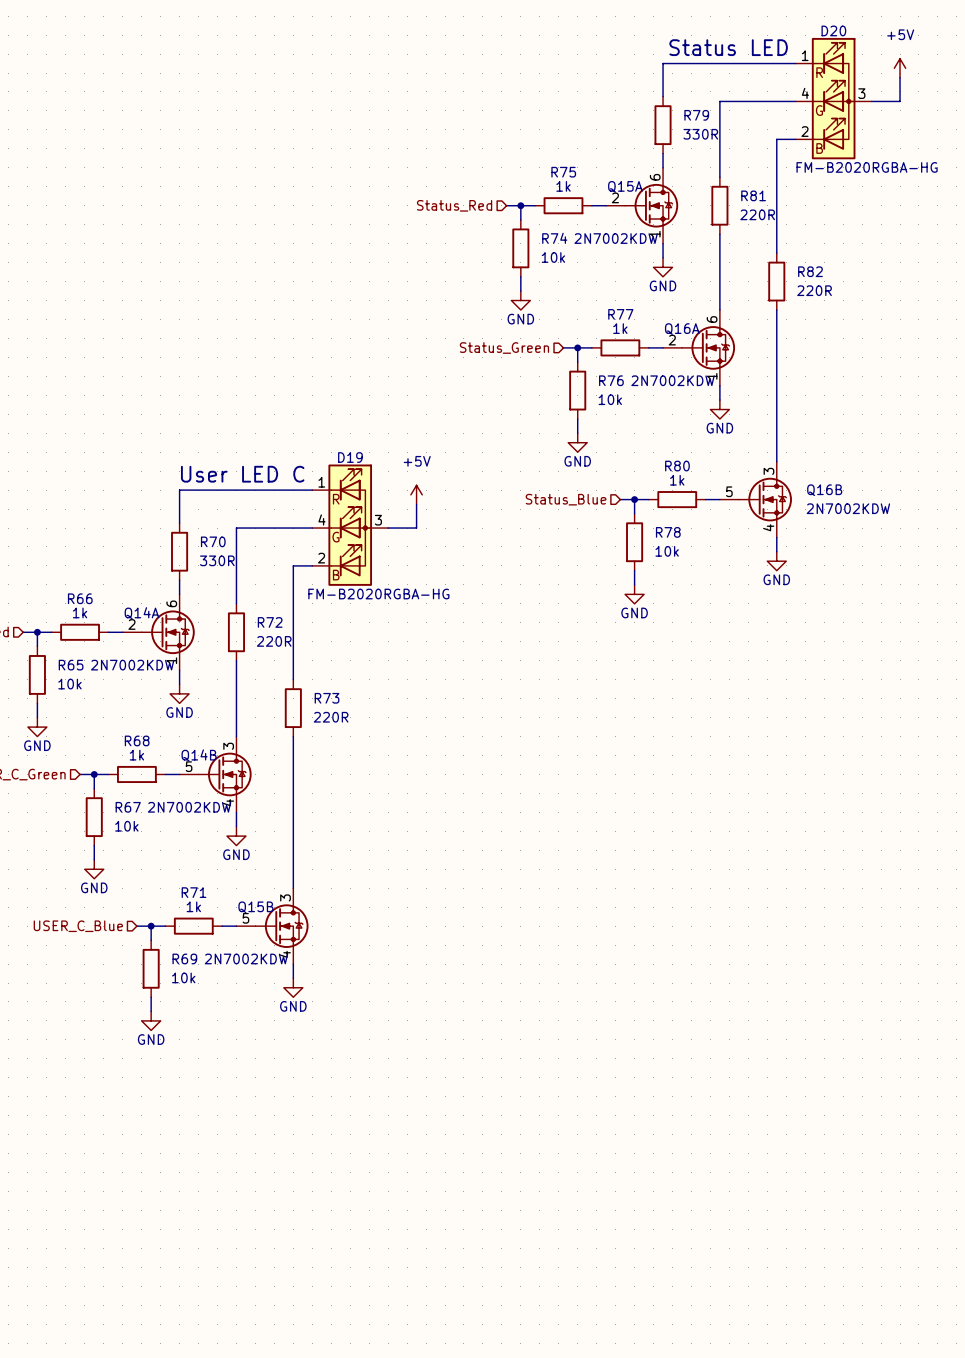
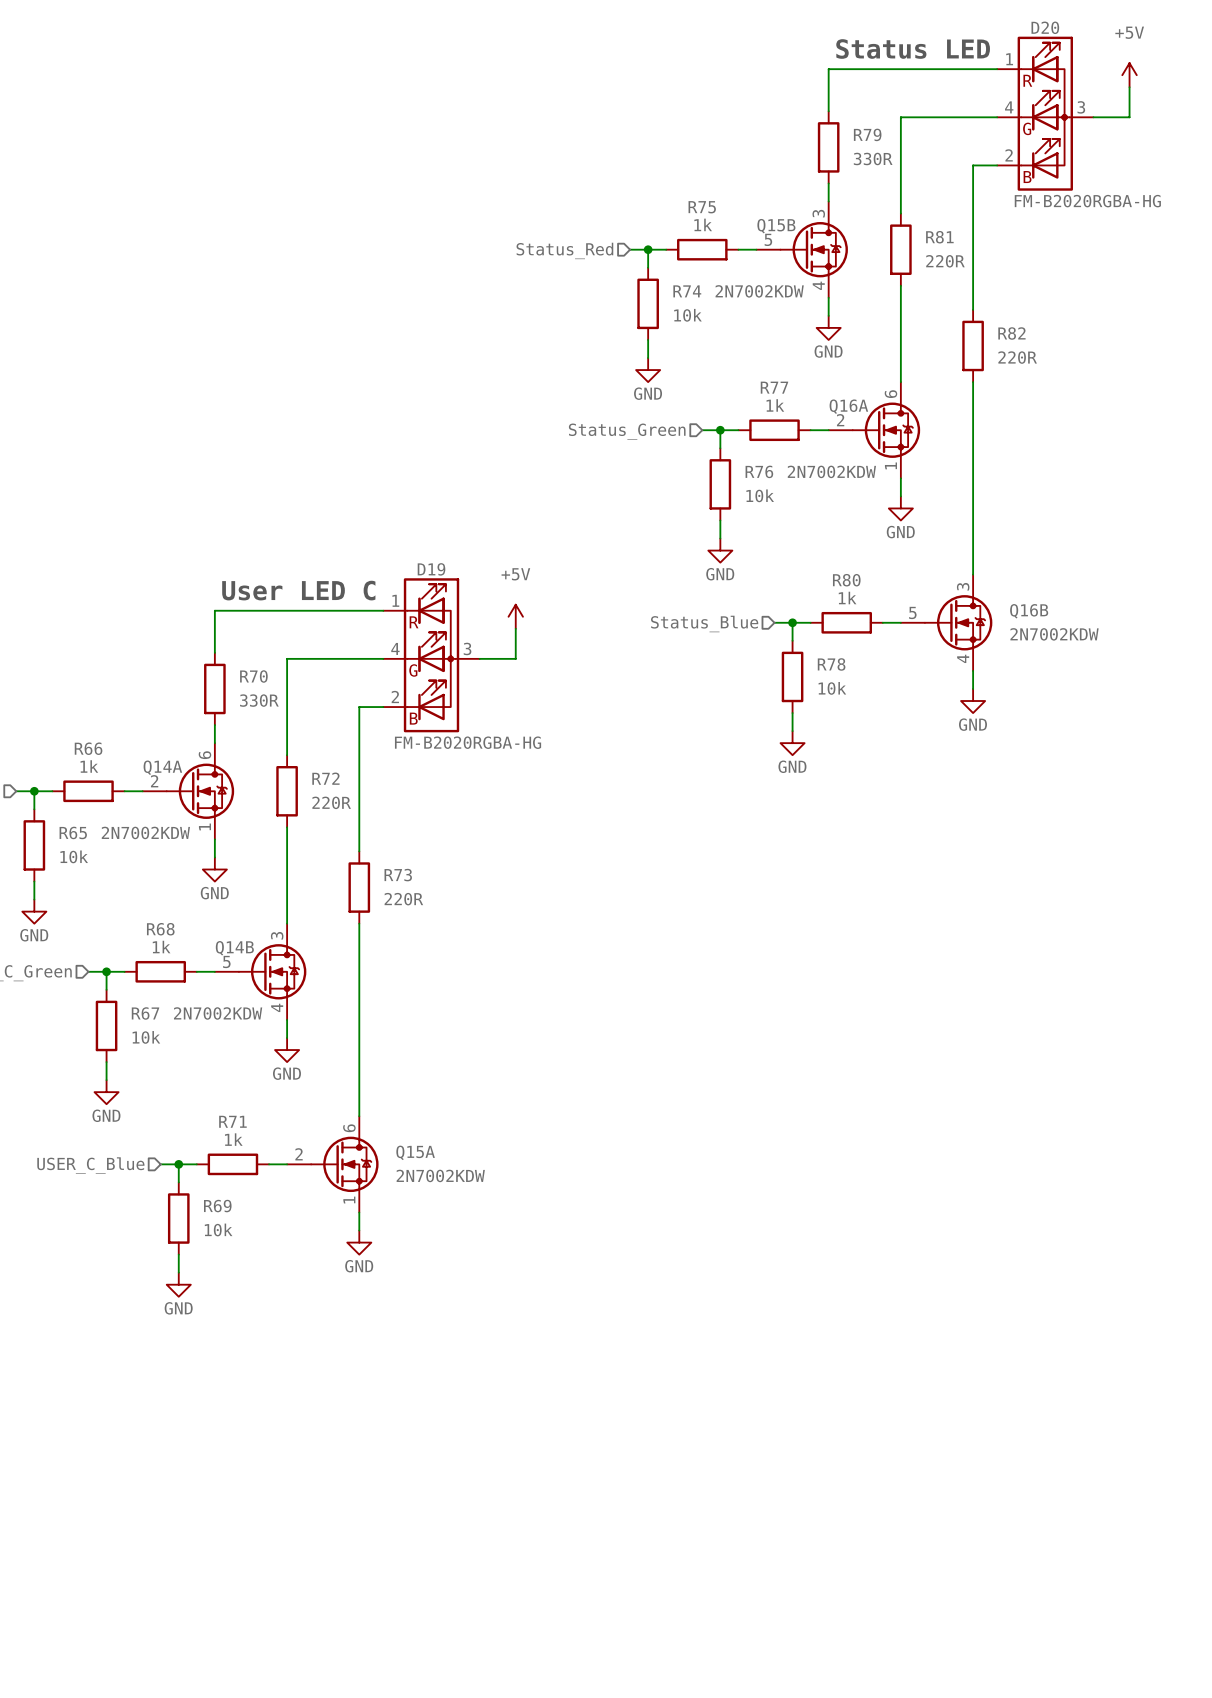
Q15A name position: Q15A (625, 186) -> Q15A (415, 1152)
Q15A position: (642, 205) -> (332, 1164)
Q15A value position: 2N7002KDW (616, 238) -> 2N7002KDW (440, 1175)
Q15B position: (272, 926) -> (802, 249)

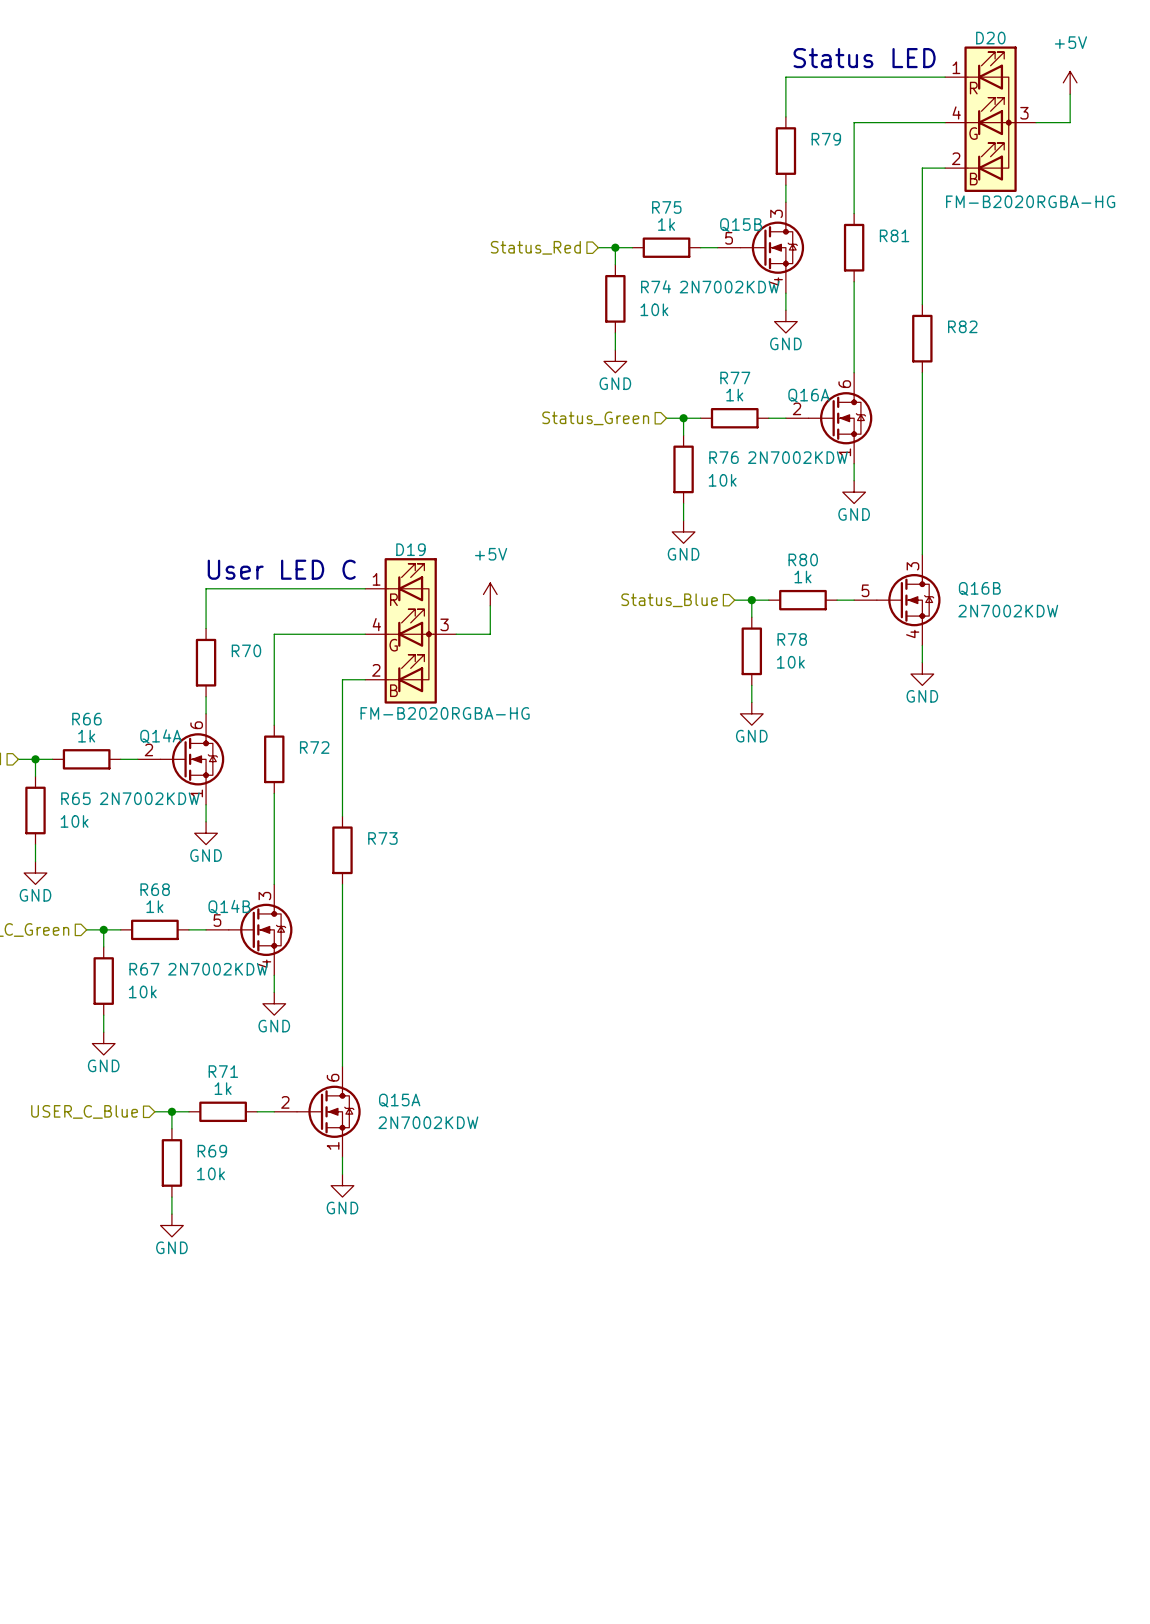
R79 value: 330R (873, 158) -> none
R81 value: 220R (945, 261) -> none
R82 value: 220R (1017, 357) -> none
R70 value: 330R (259, 700) -> none
R72 value: 220R (331, 802) -> none
R73 value: 220R (403, 899) -> none

